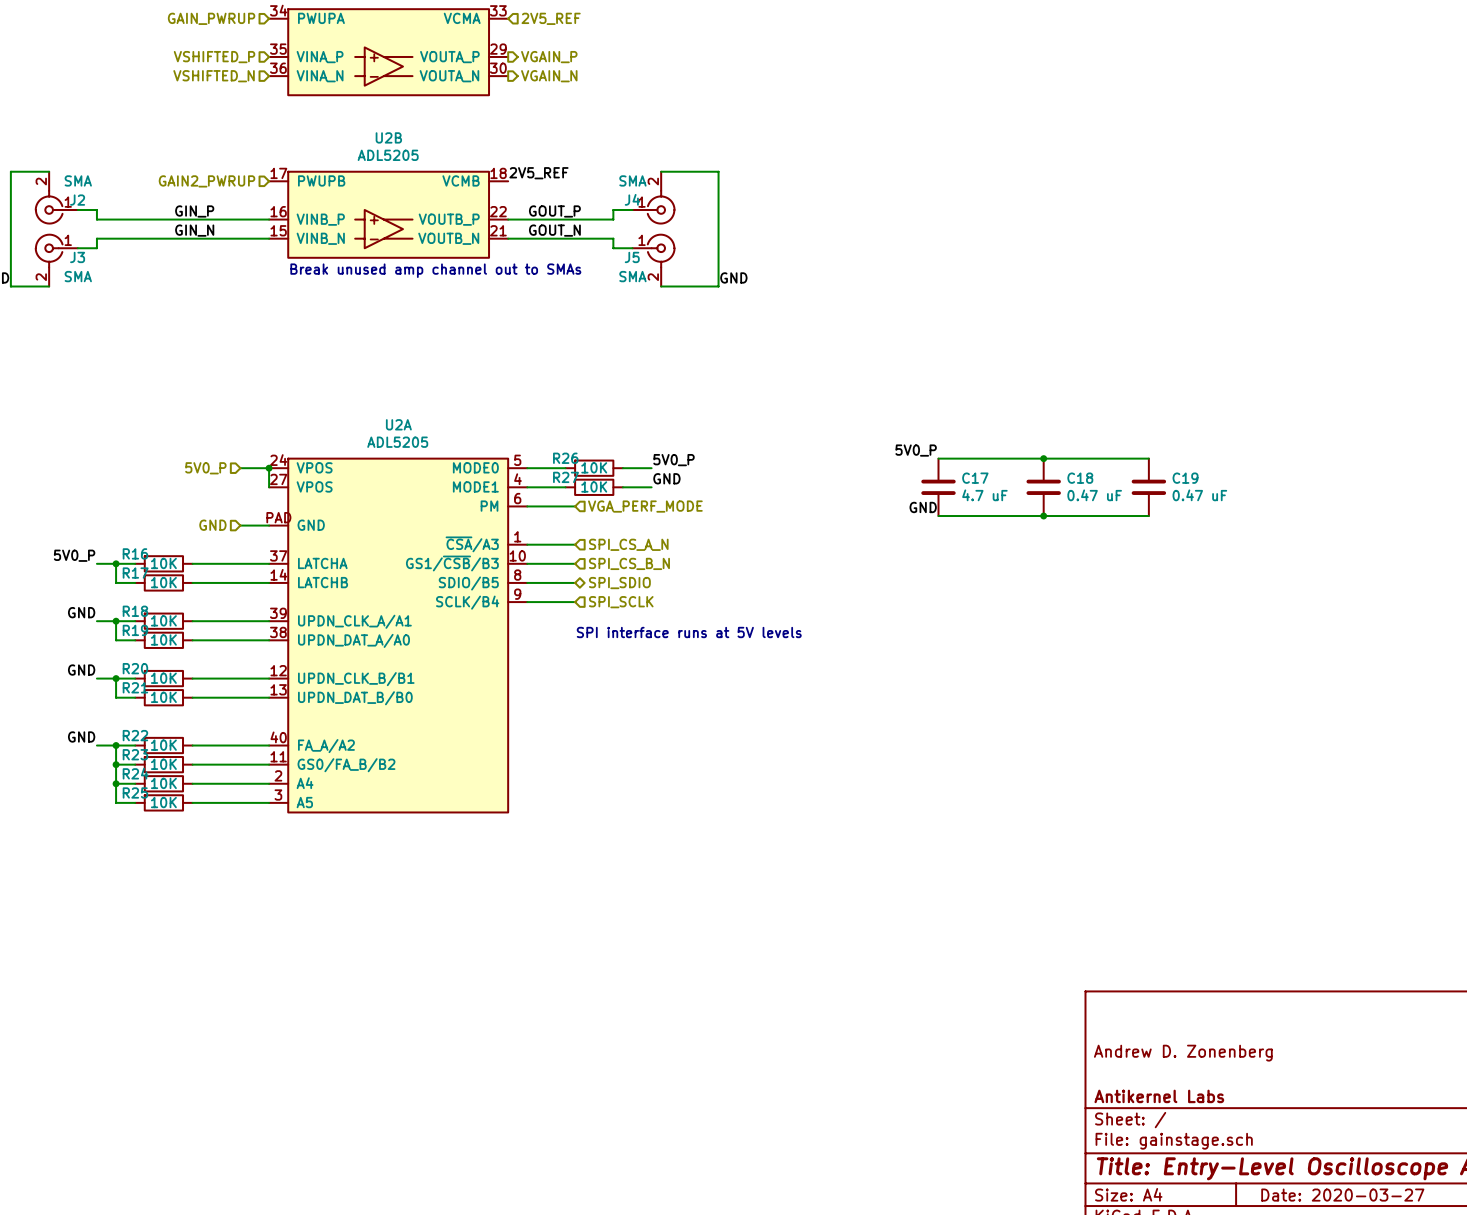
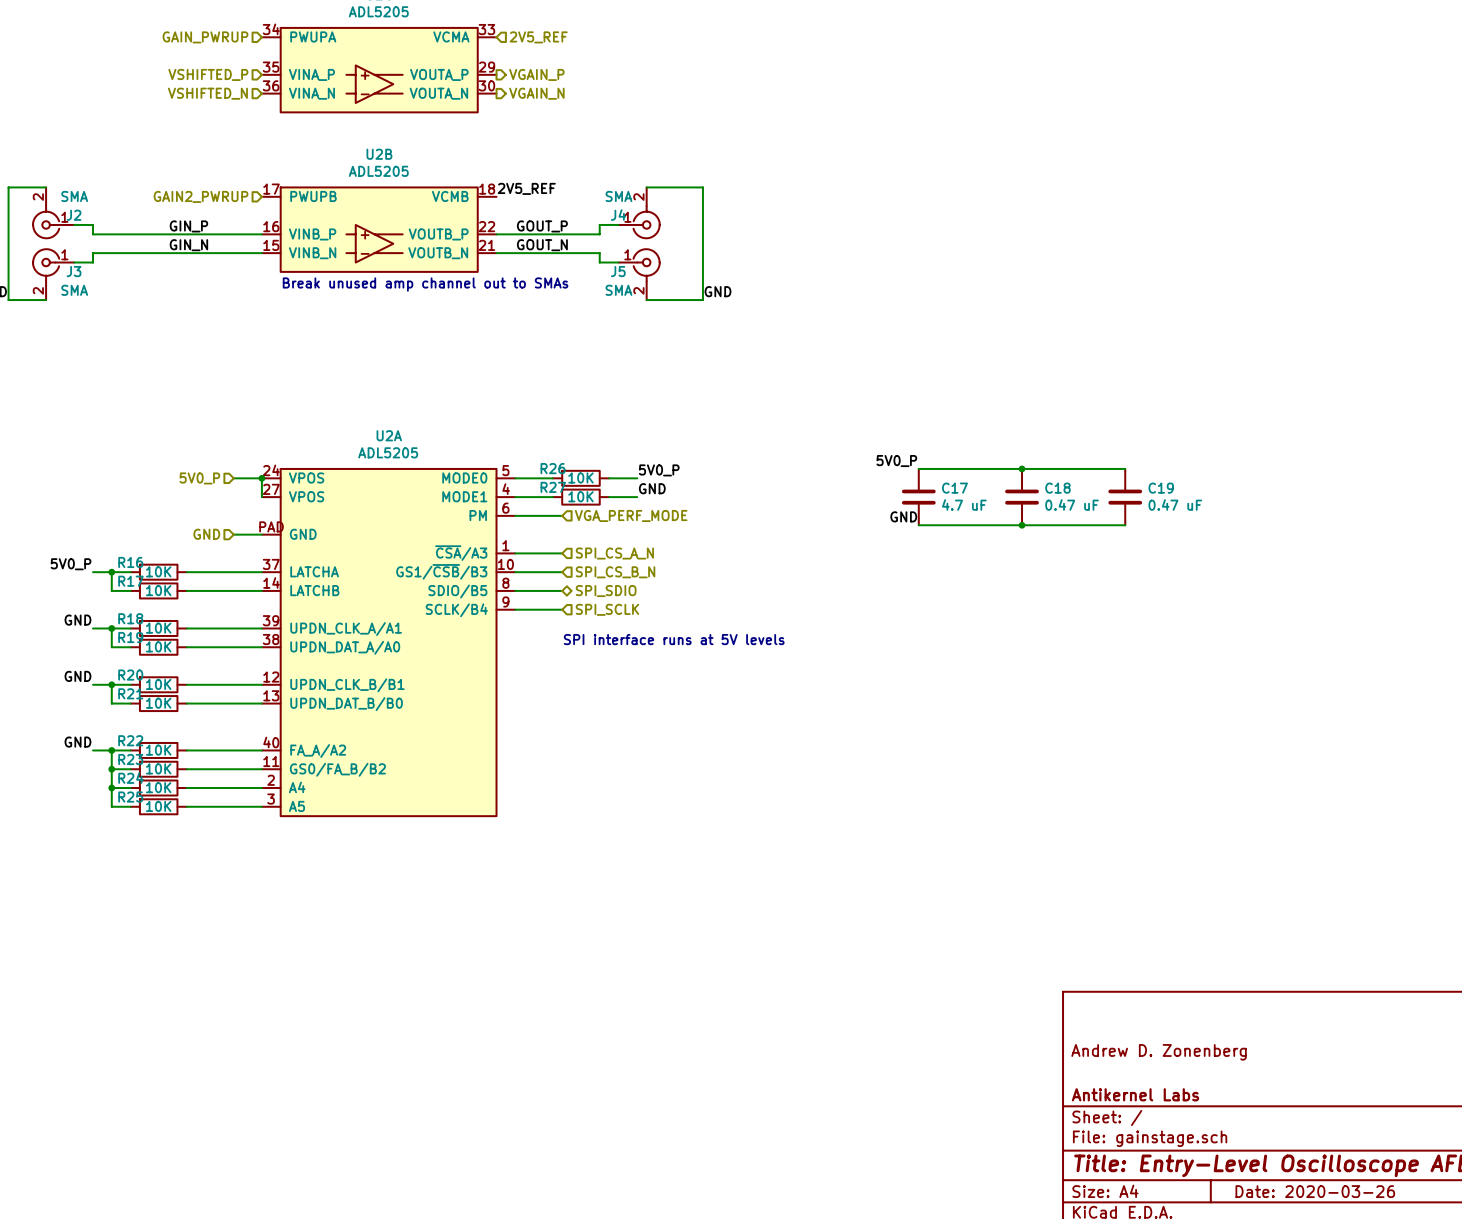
title block: Date: 2020-03-27 (1342, 1195) -> Date: 2020-03-26 (1315, 1191)

